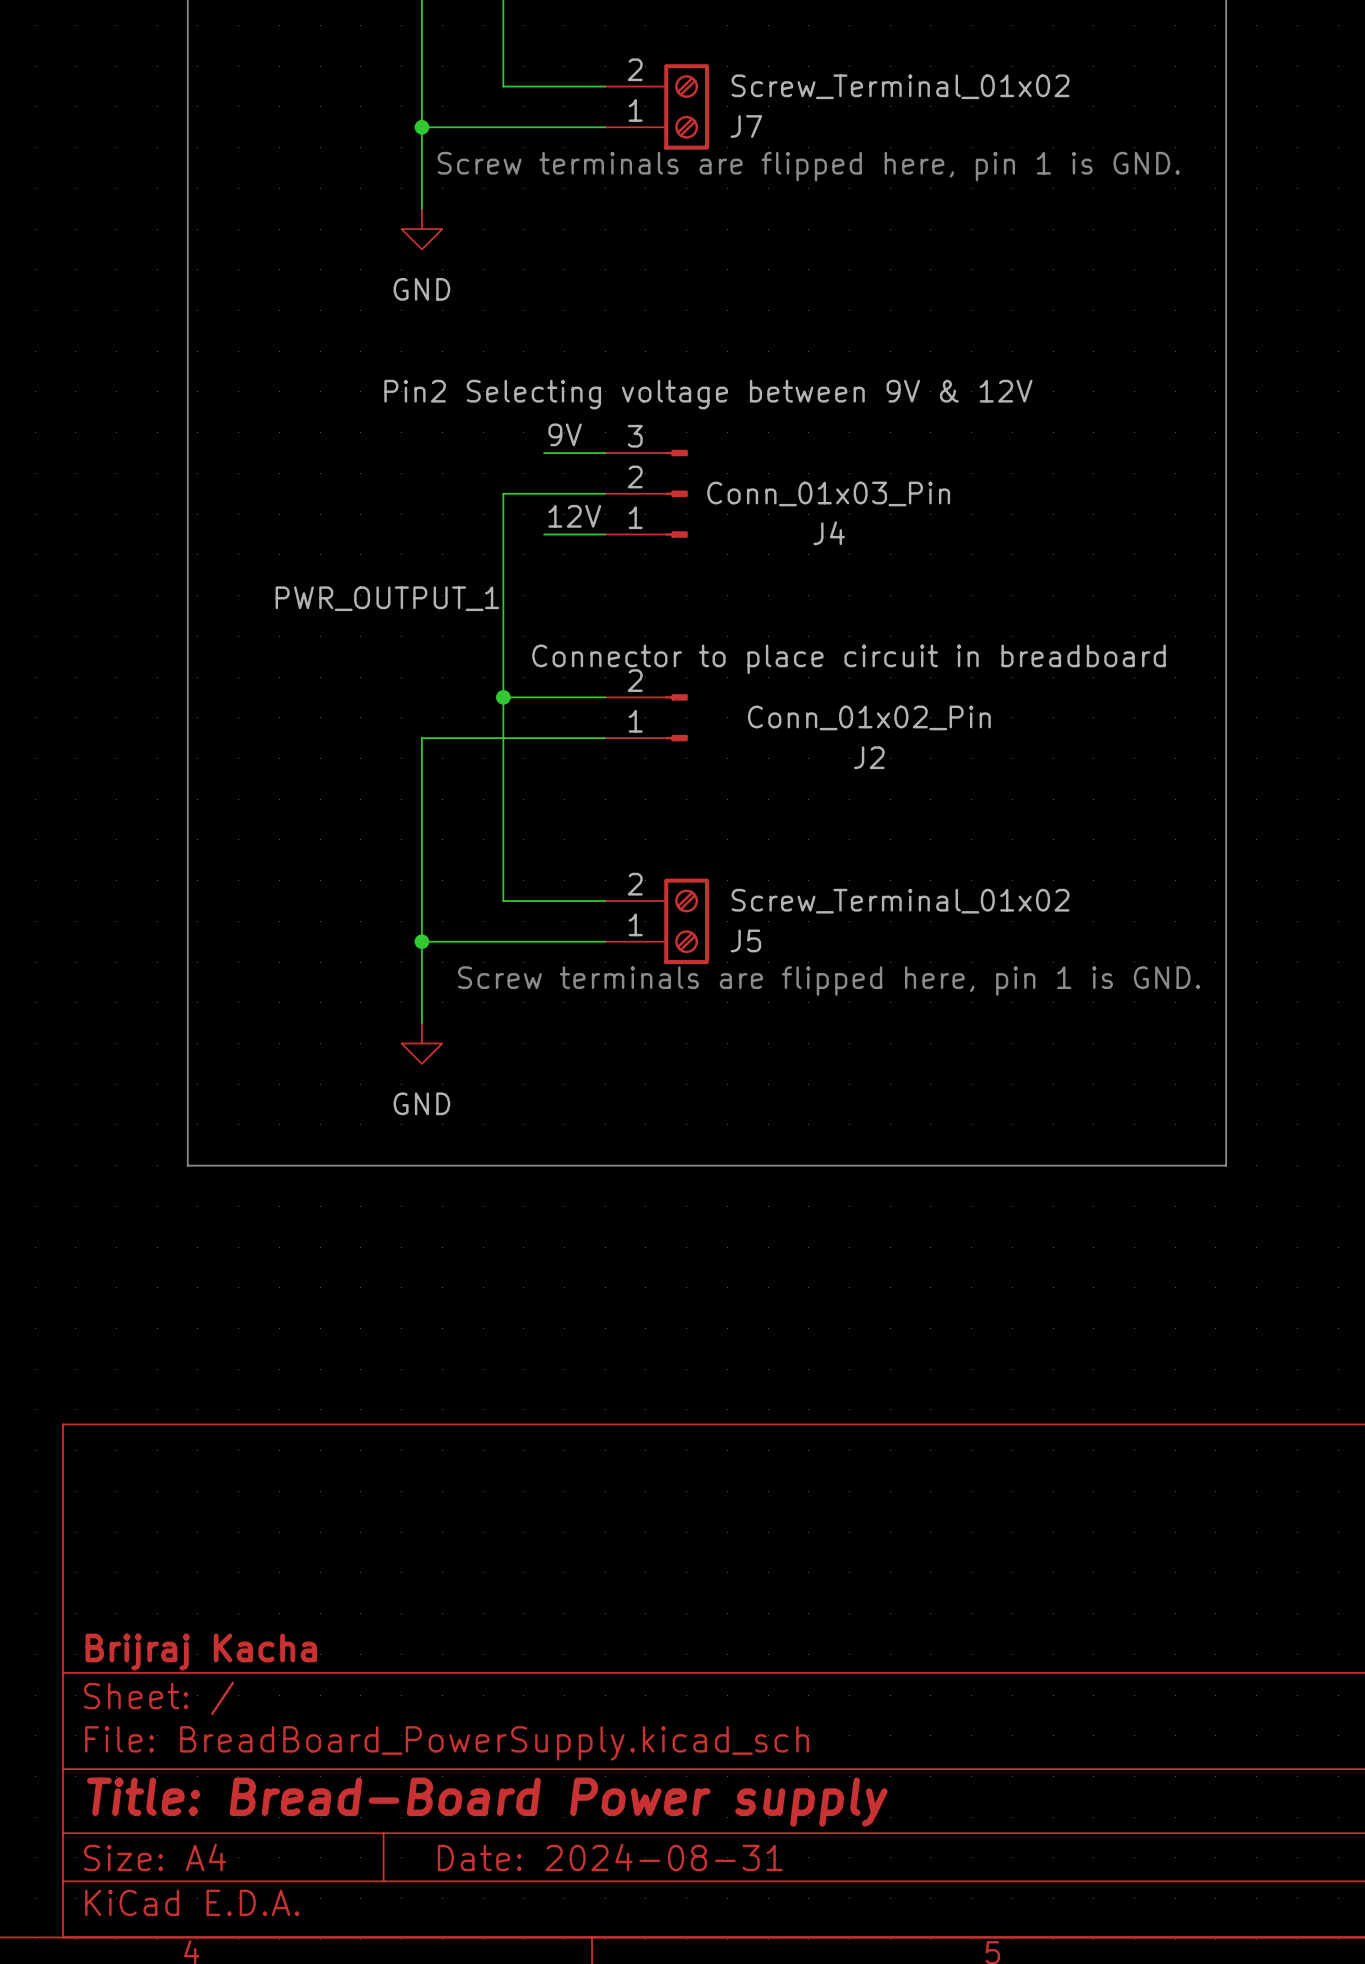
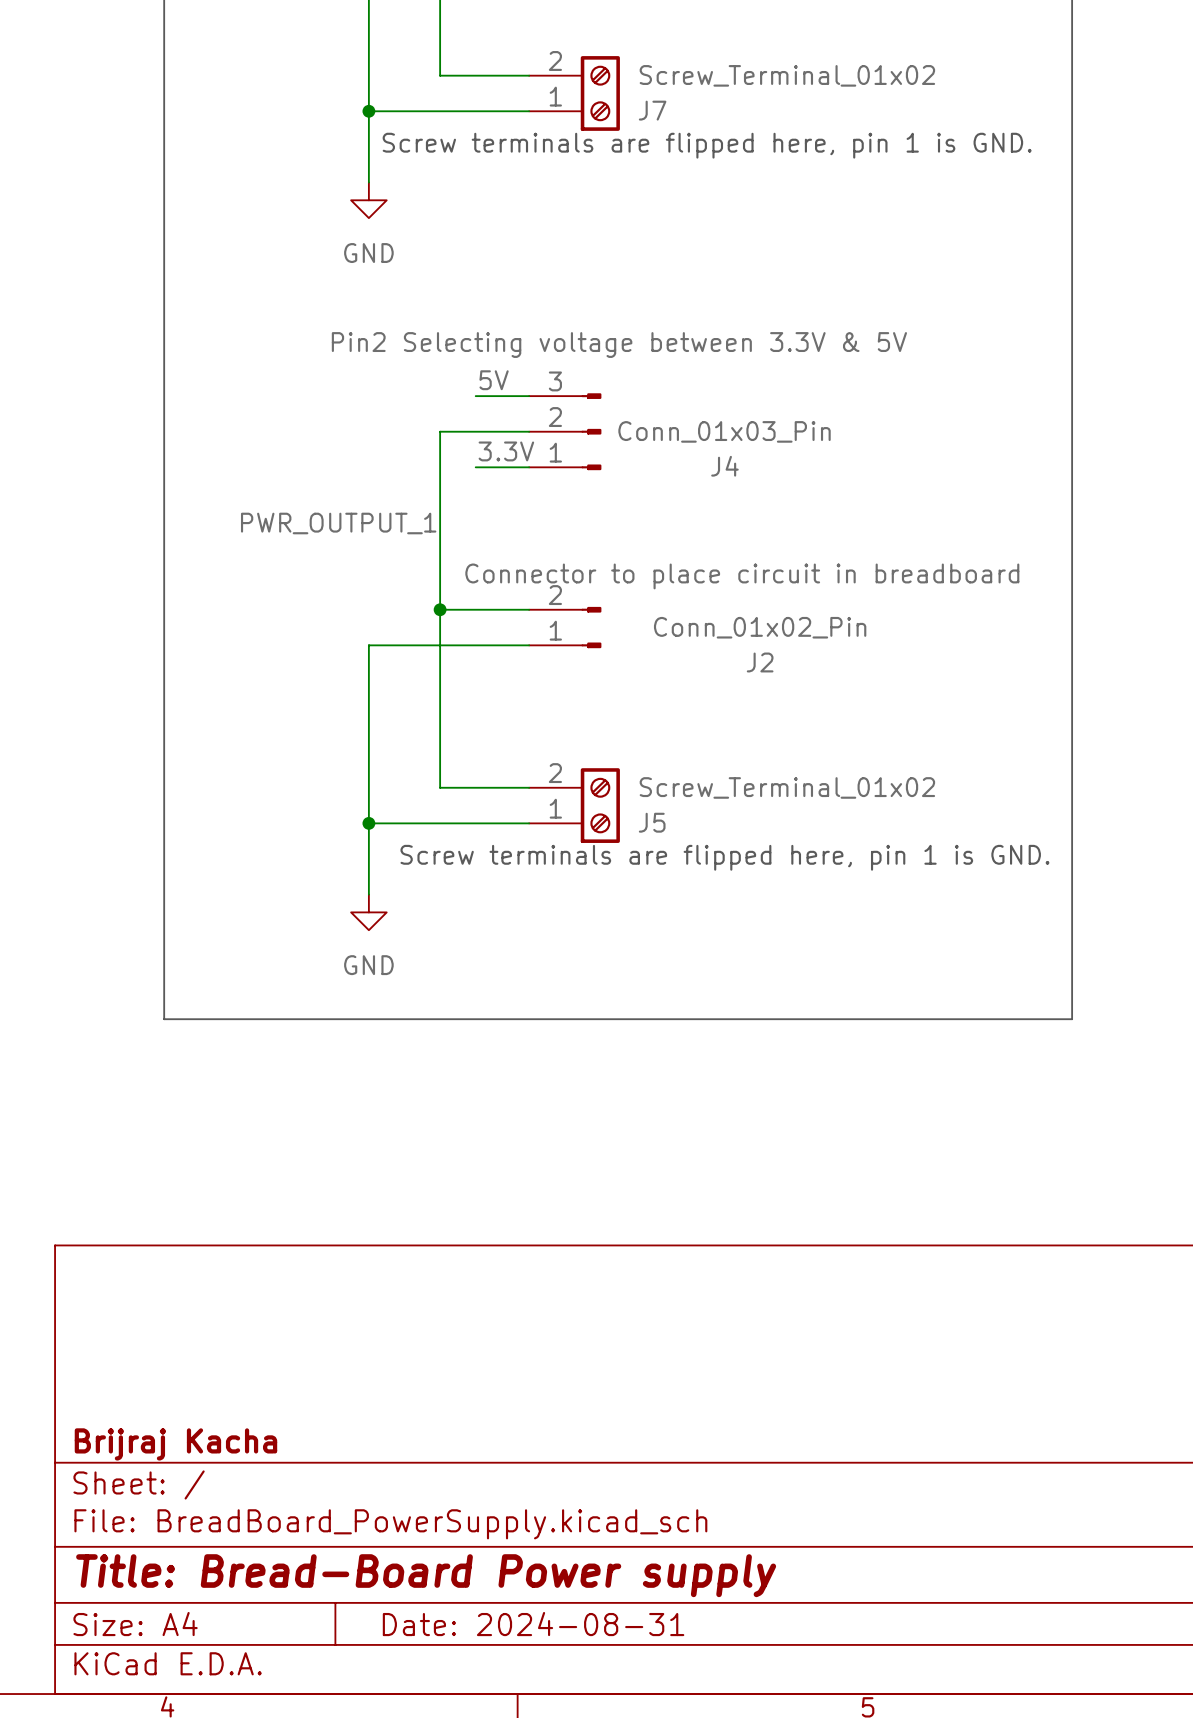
J4 text: Pin2 Selecting voltage between 9V & 12V (708, 394) -> Pin2 Selecting voltage between 3.3V & 5V (619, 345)
label: 9V (565, 434) -> 5V (494, 380)
label: 12V (574, 516) -> 3.3V (506, 451)

